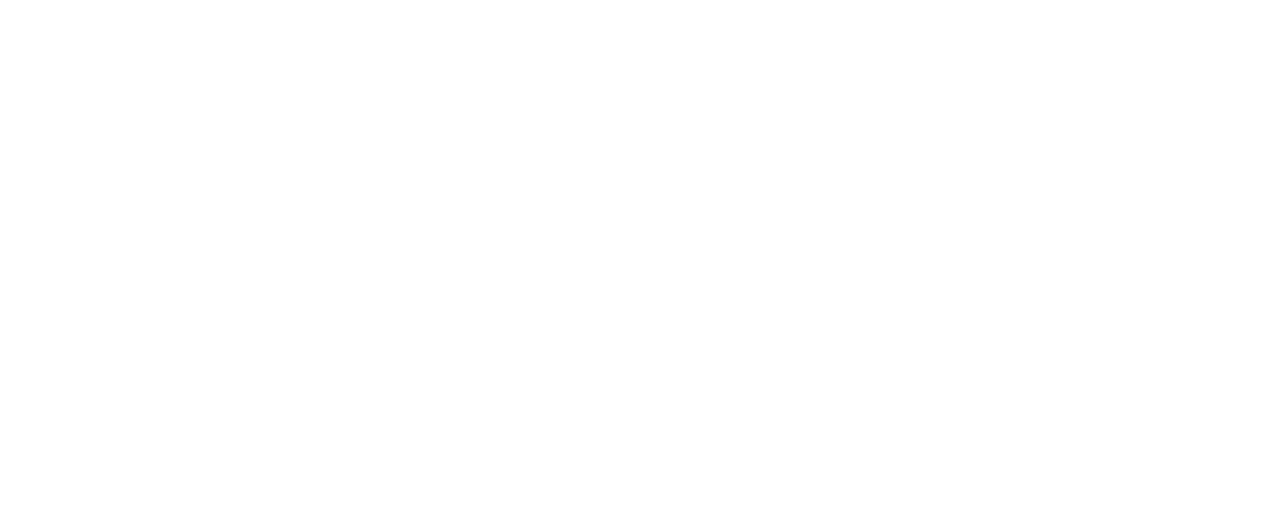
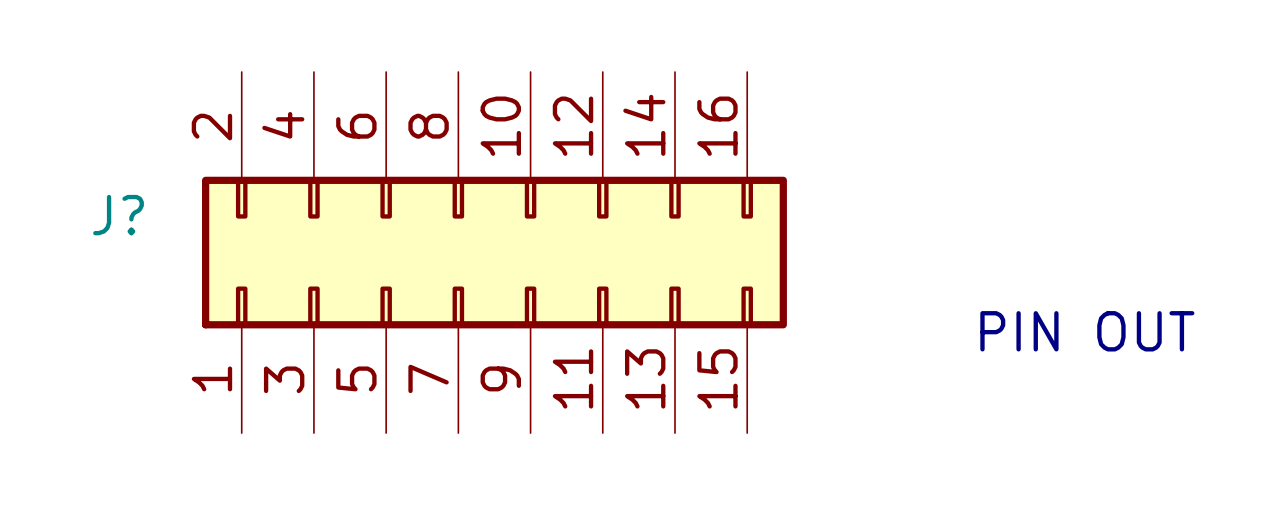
J?: none -> (494, 252)
text: none -> PIN OUT (1087, 331)

